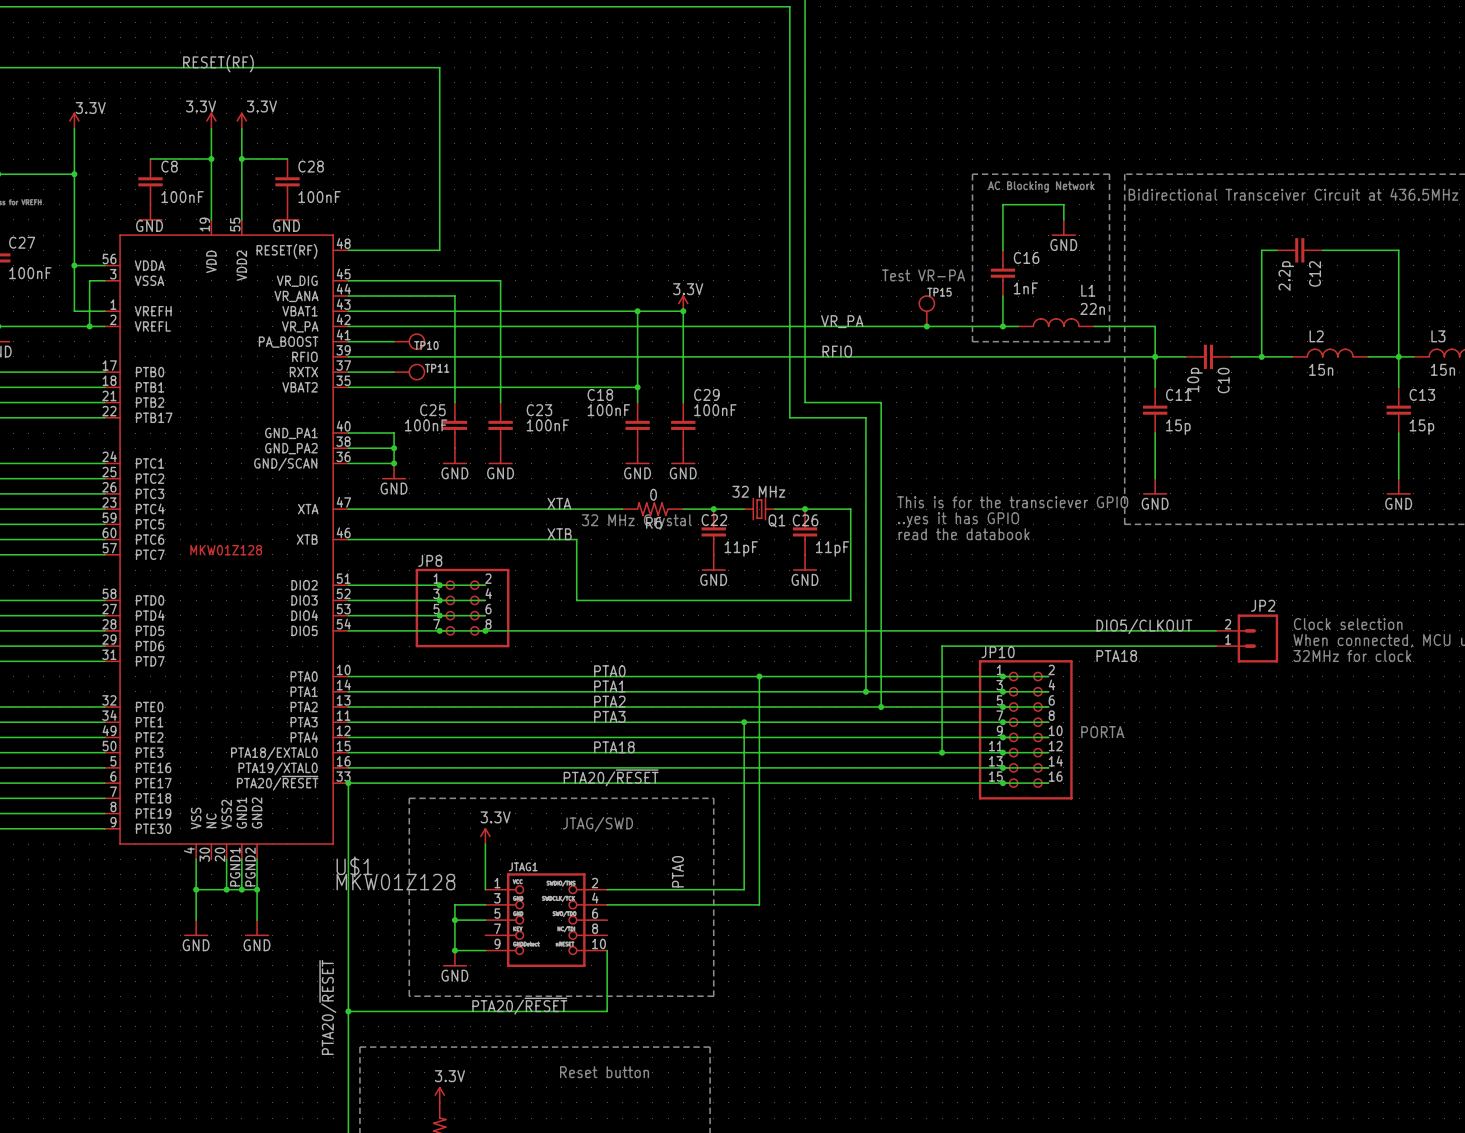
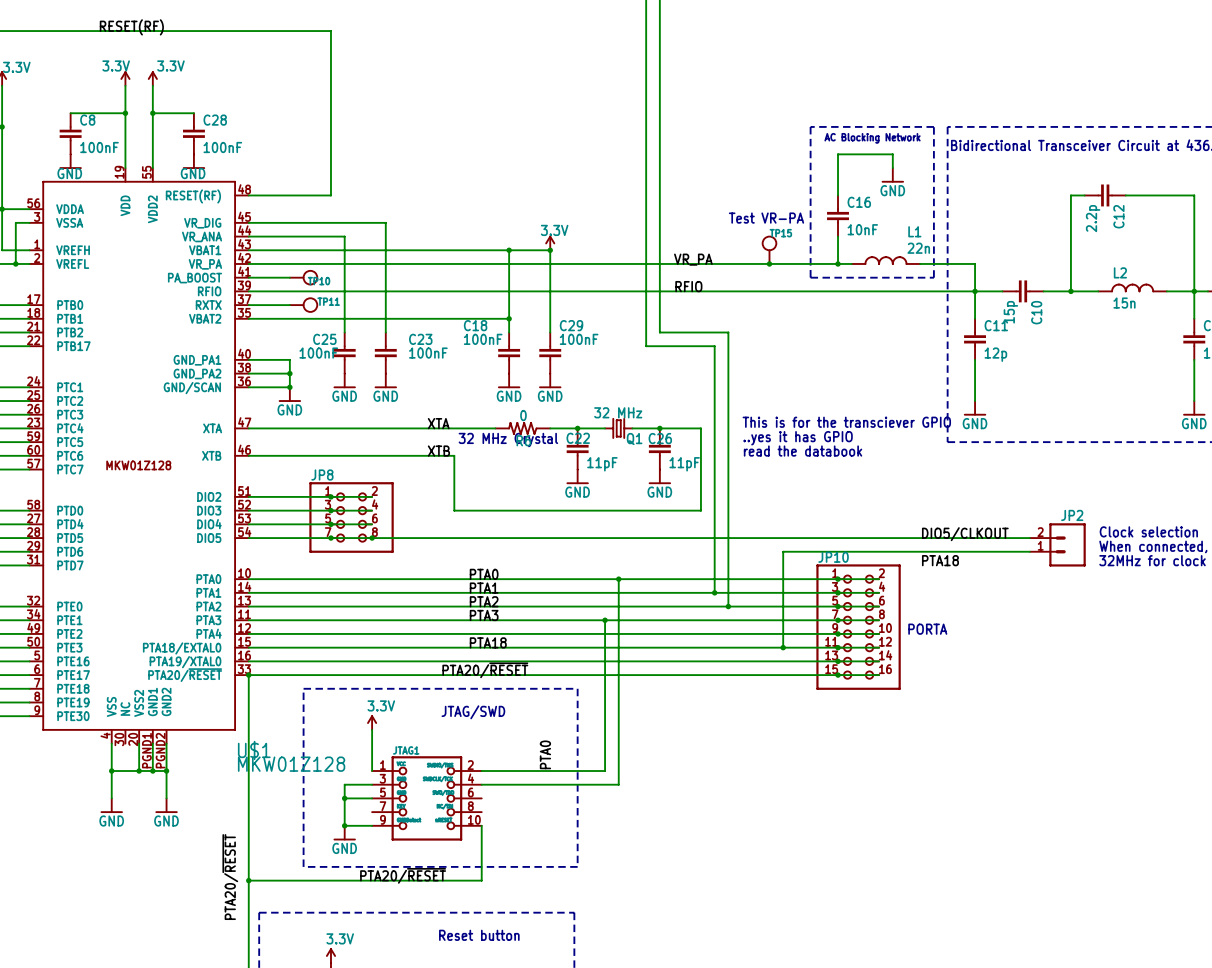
C16 value: 1nF (1025, 288) -> 10nF (862, 229)
C10 value: 10p (1195, 380) -> 15p (1010, 312)
C11 value: 15p (1178, 427) -> 12p (995, 354)

